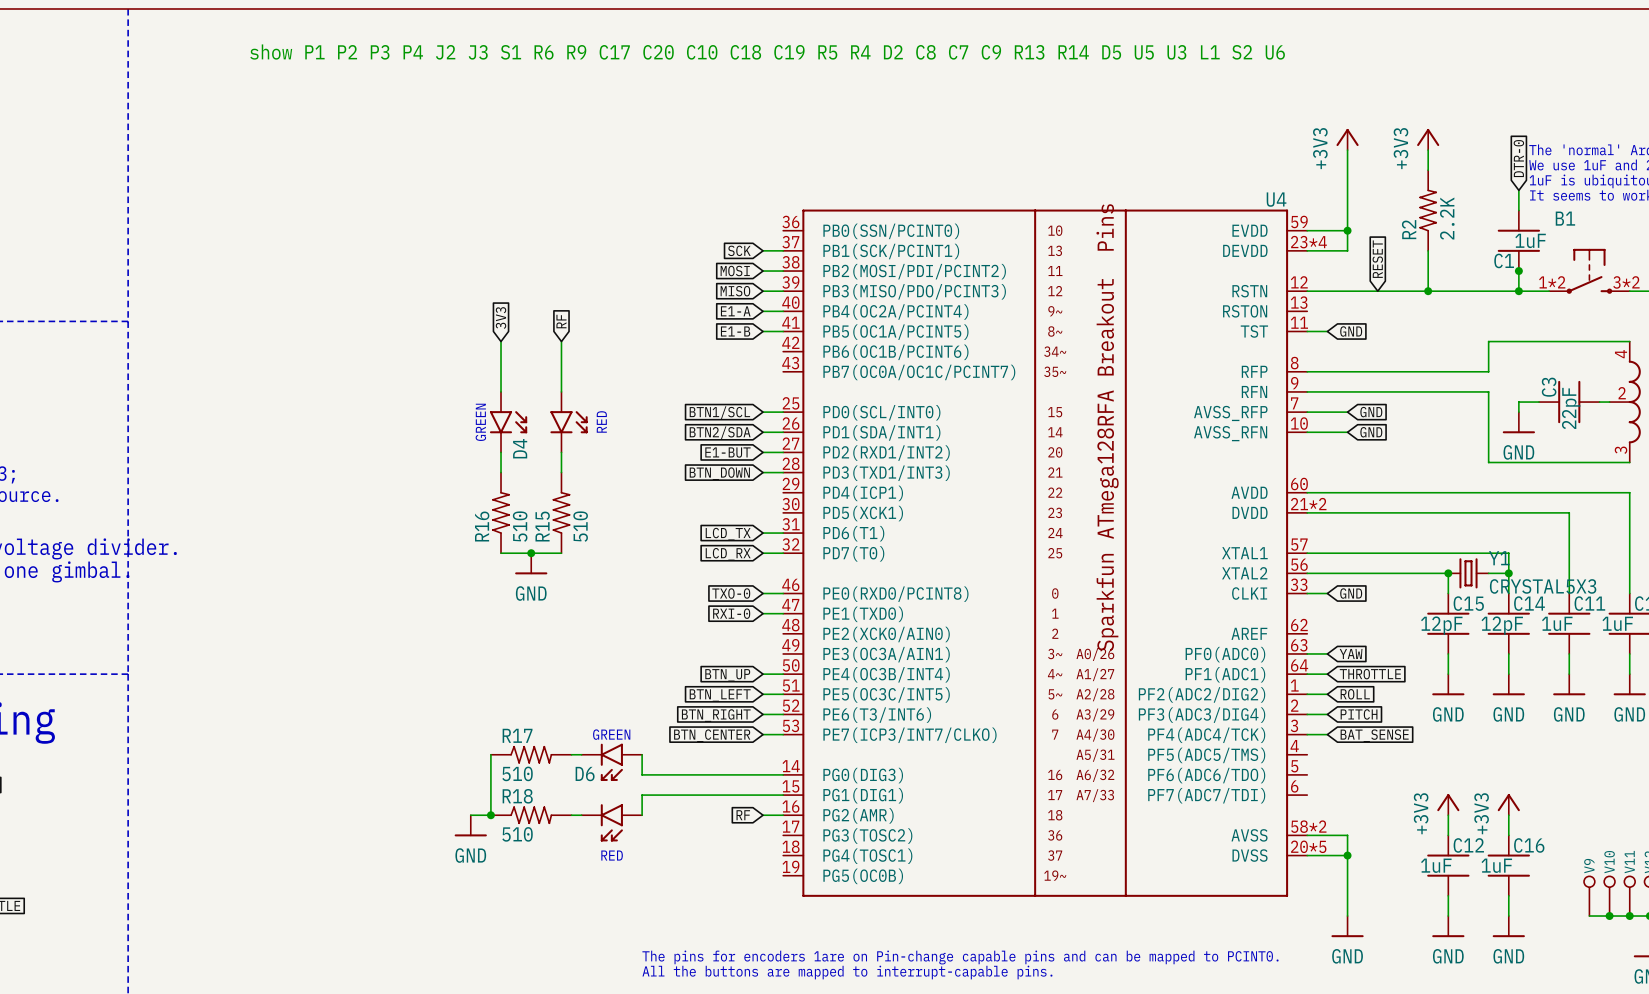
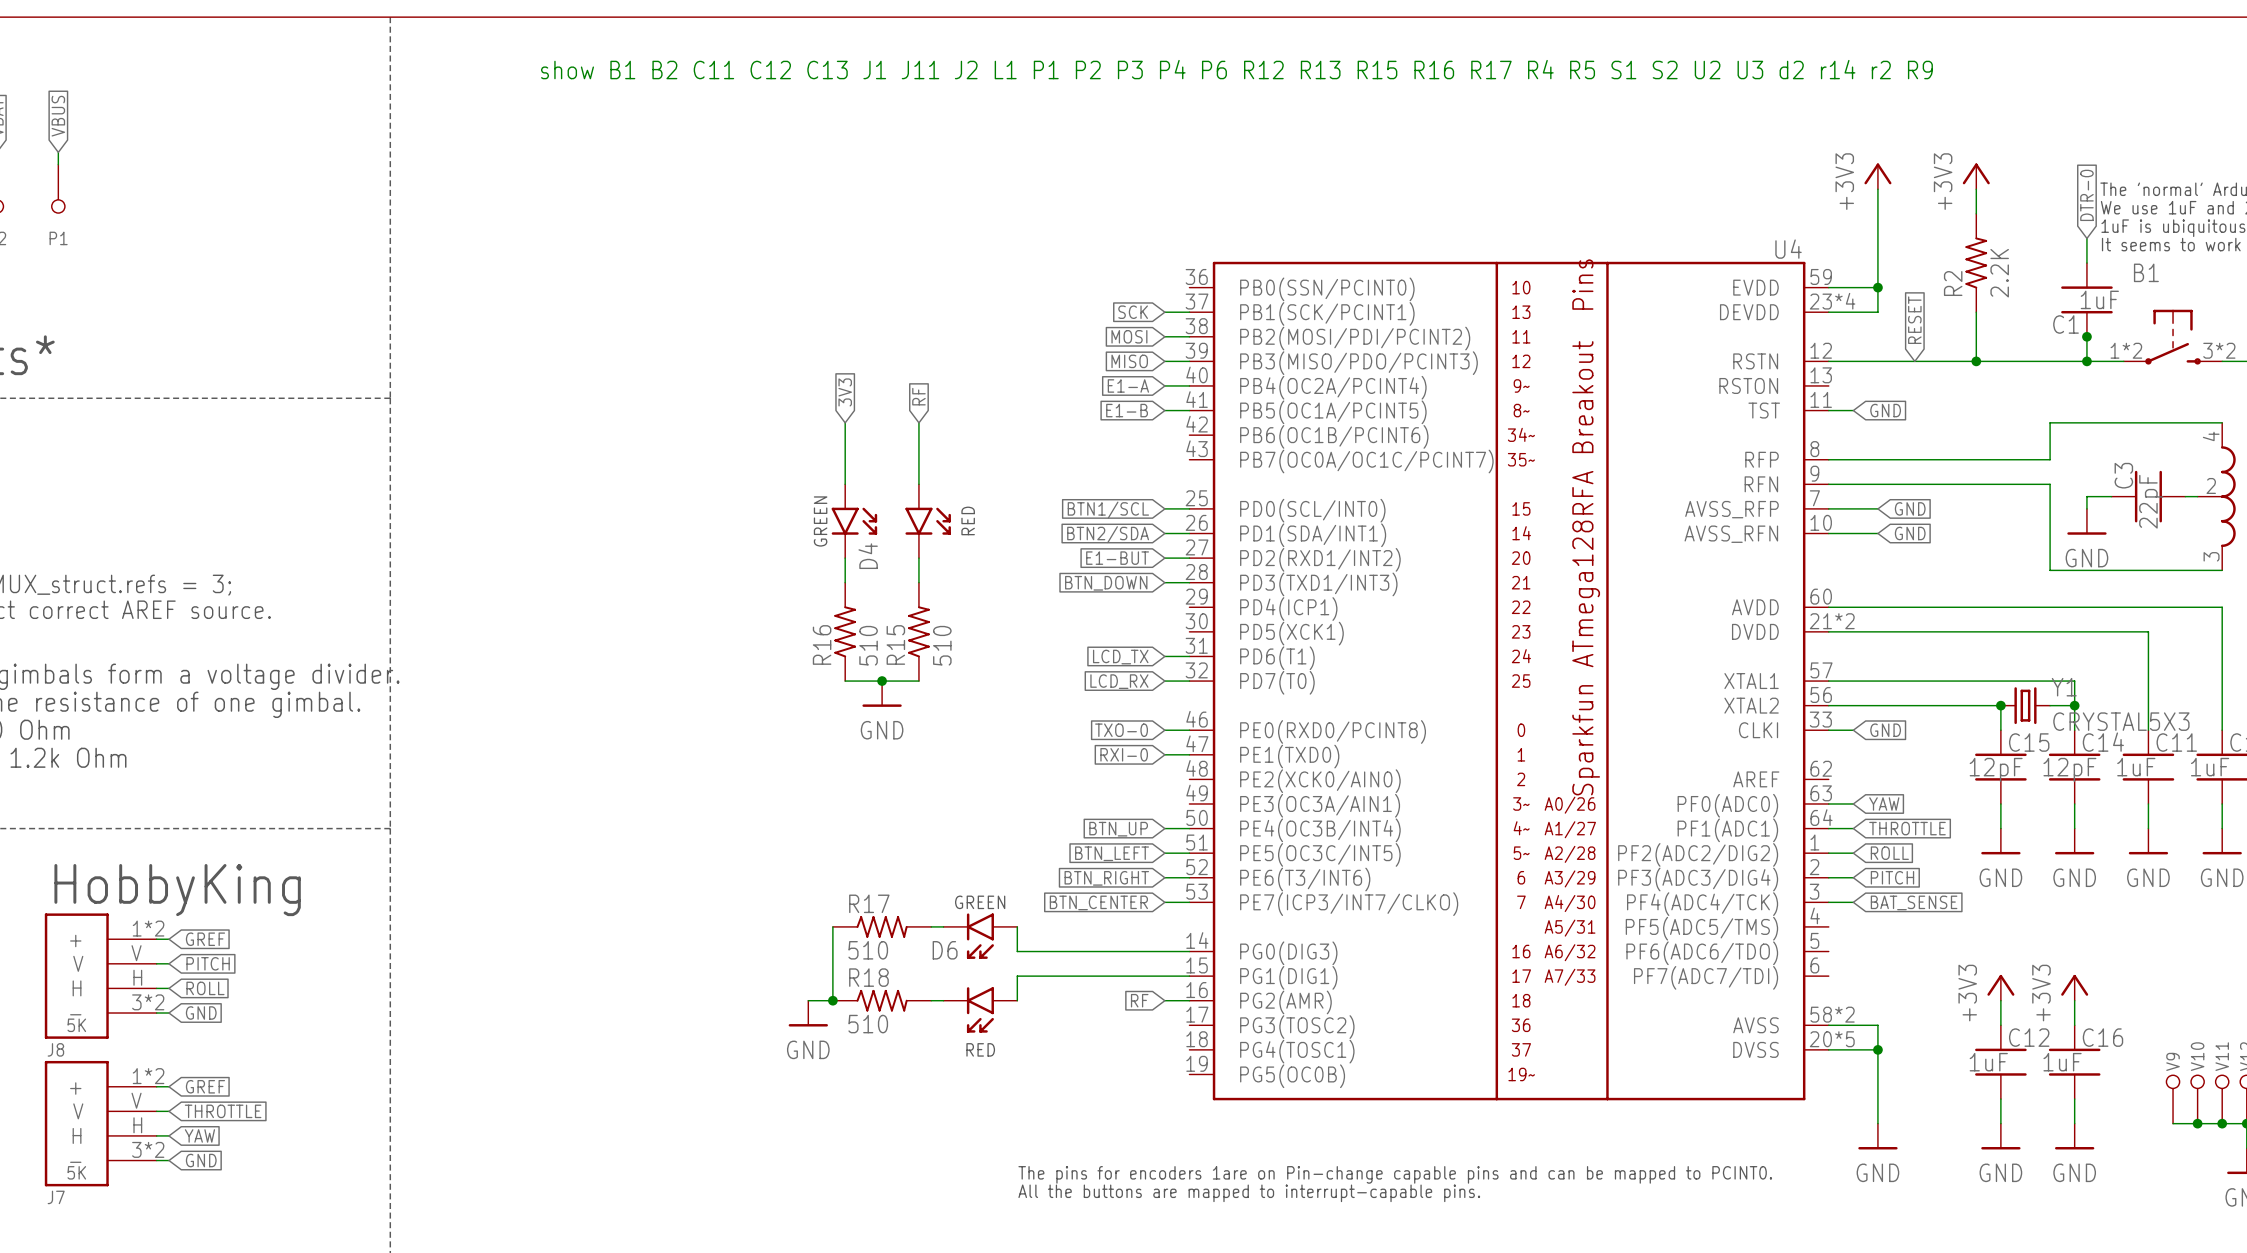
text: show P1 P2 P3 P4 J2 J3 S1 R6 R9 C17 C20 C10 C18 C19 R5 R4 D2 C8 C7 C9 R13 R14 D5 U5 U3 L1 S2 U6 (767, 52) -> show B1 B2 C11 C12 C13 J1 J11 J2 L1 P1 P2 P3 P4 P6 R12 R13 R15 R16 R17 R4 R5 S1 S2 U2 U3 d2 r14 r2 R9 (1236, 69)

